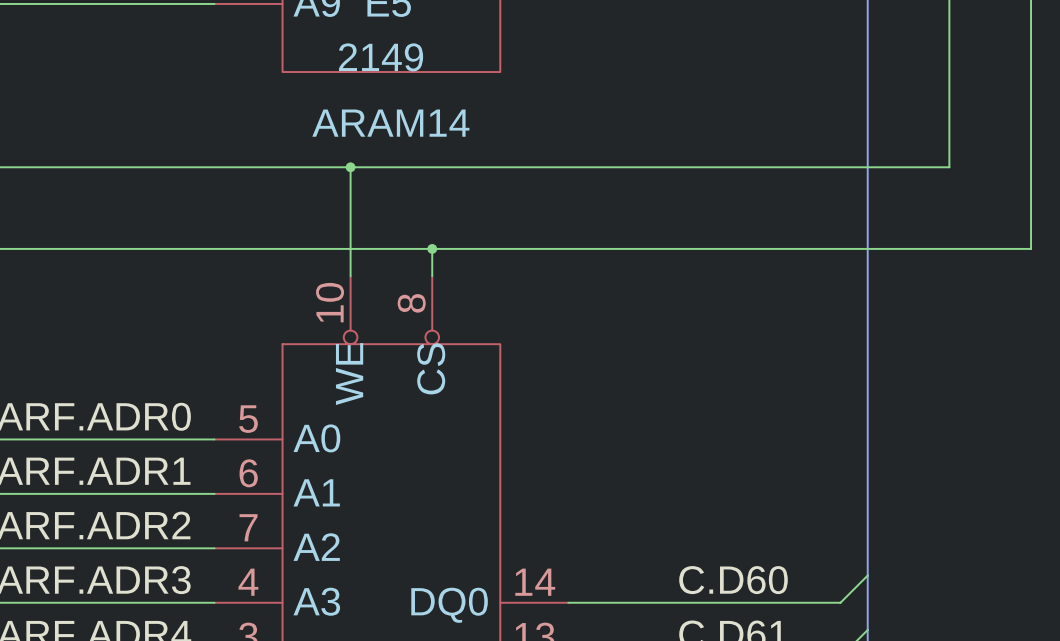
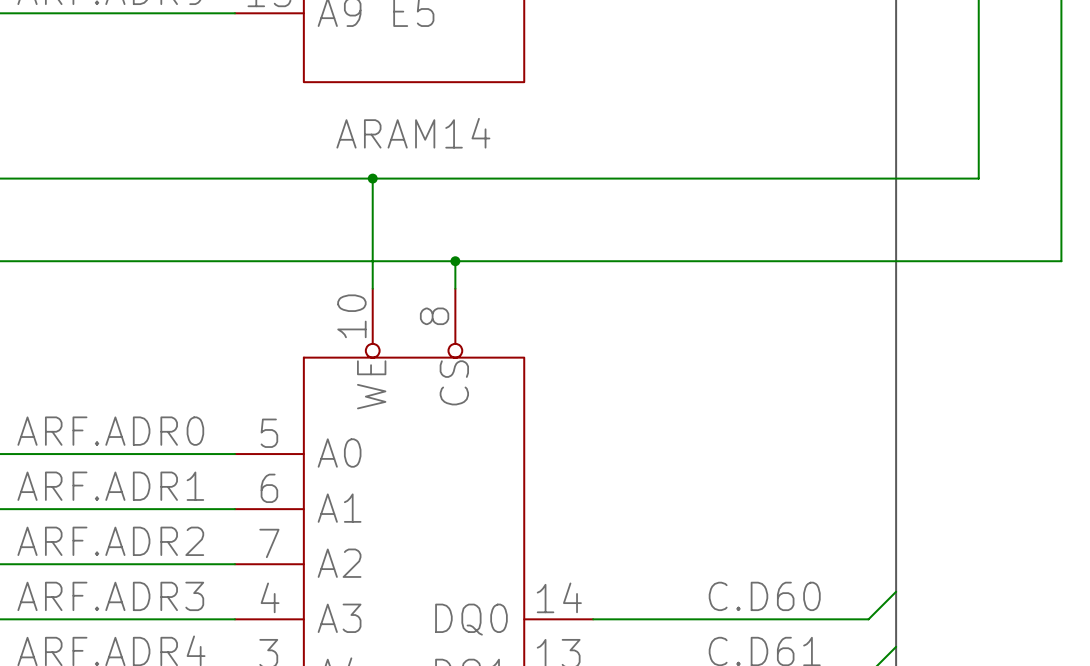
part value: 2149 (381, 57) -> none

